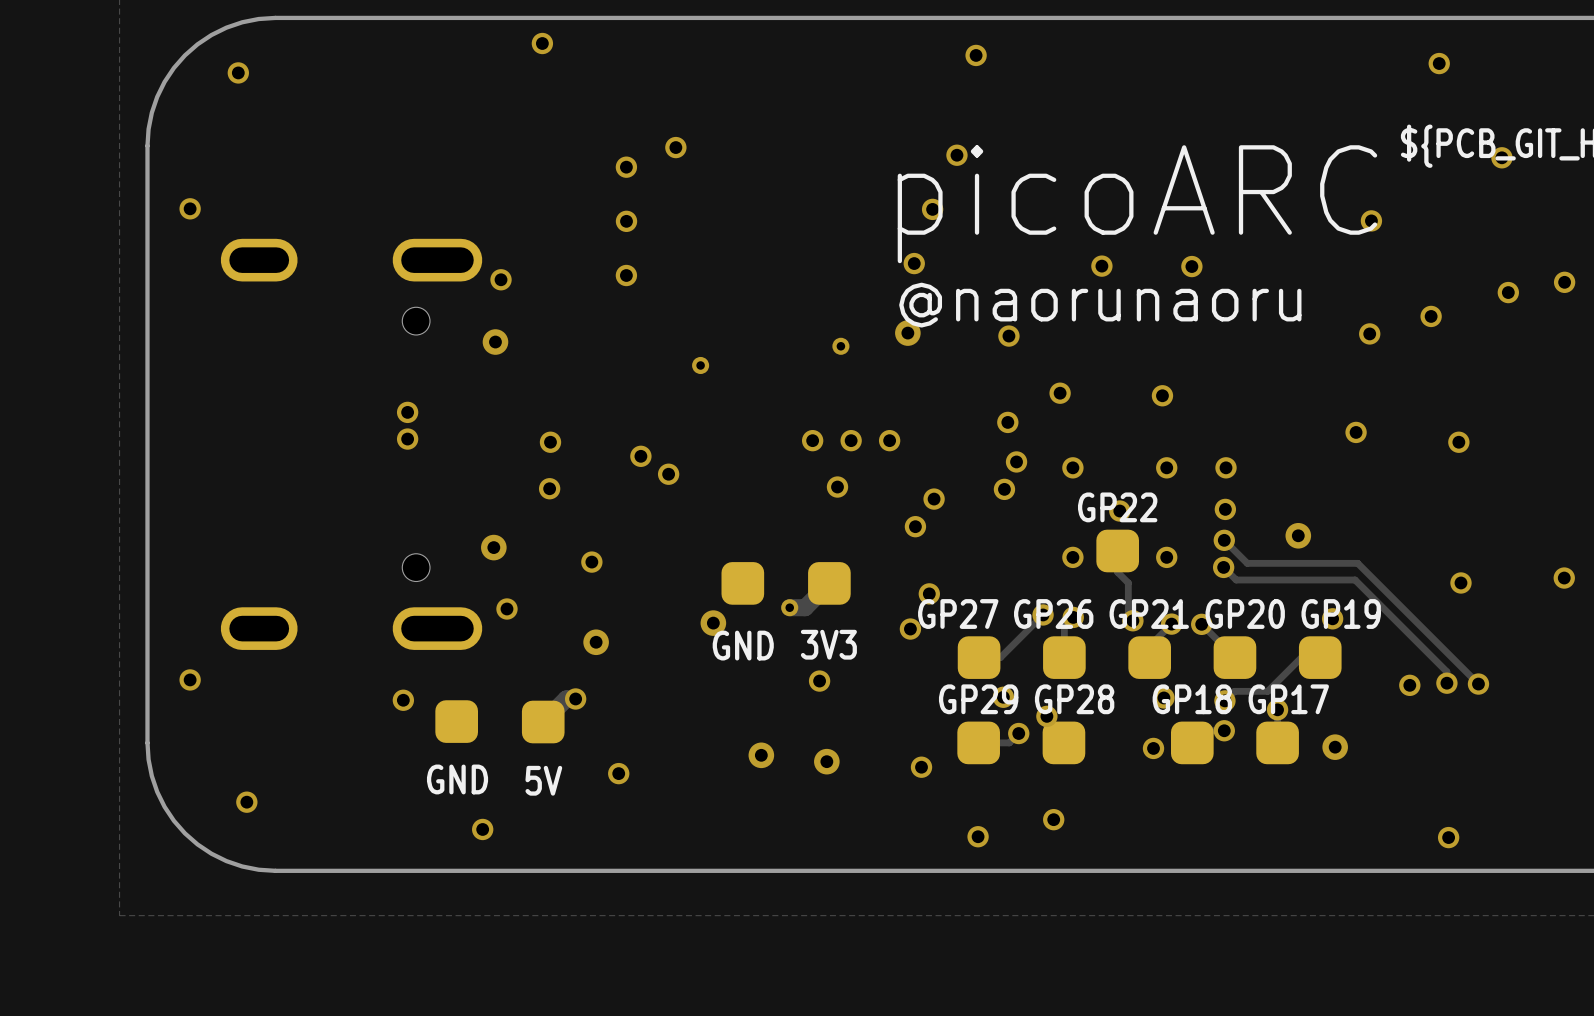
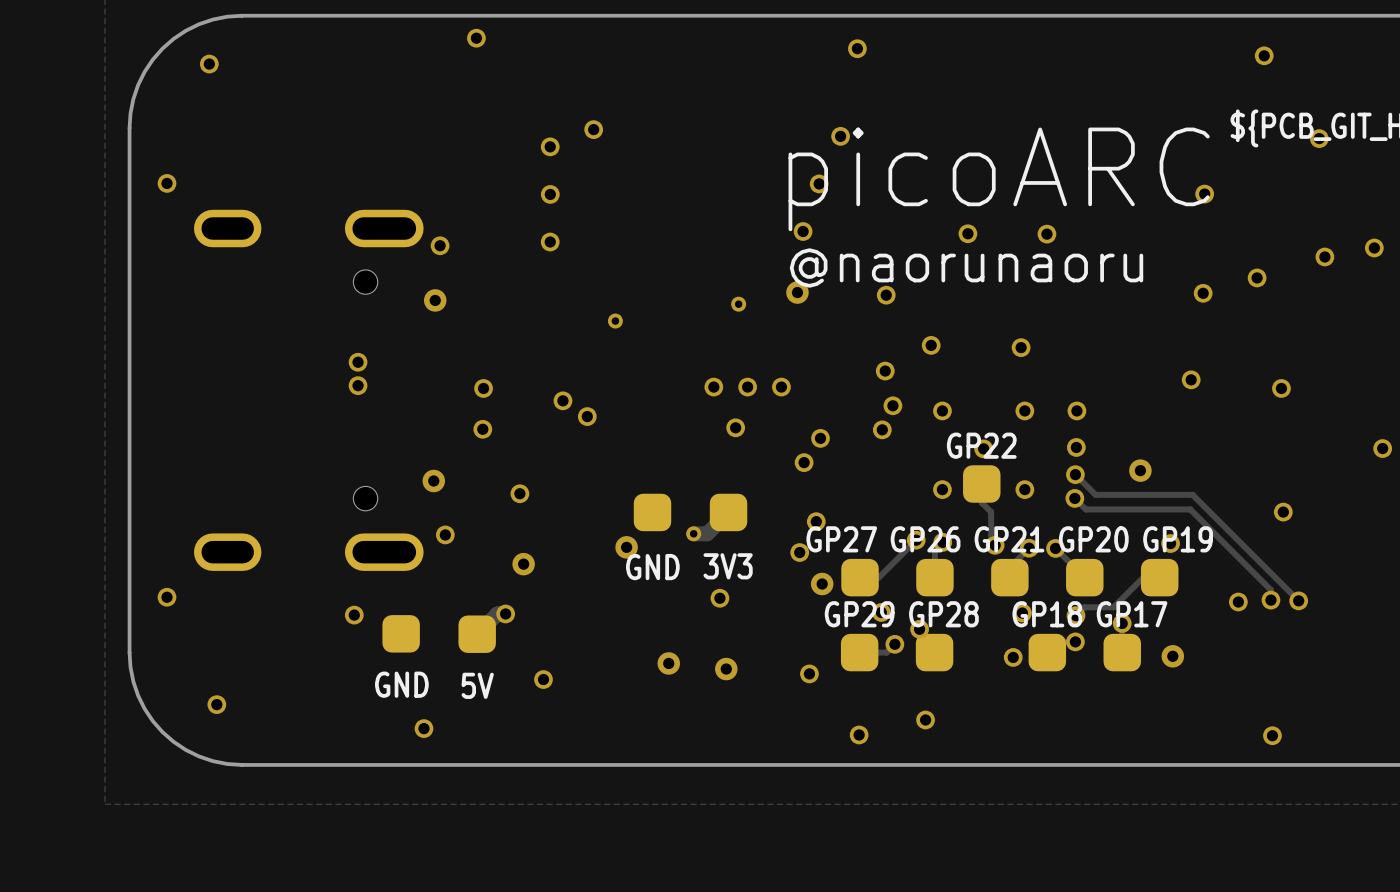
via position: (1564, 578) -> (1382, 448)
via: none -> (822, 584)

